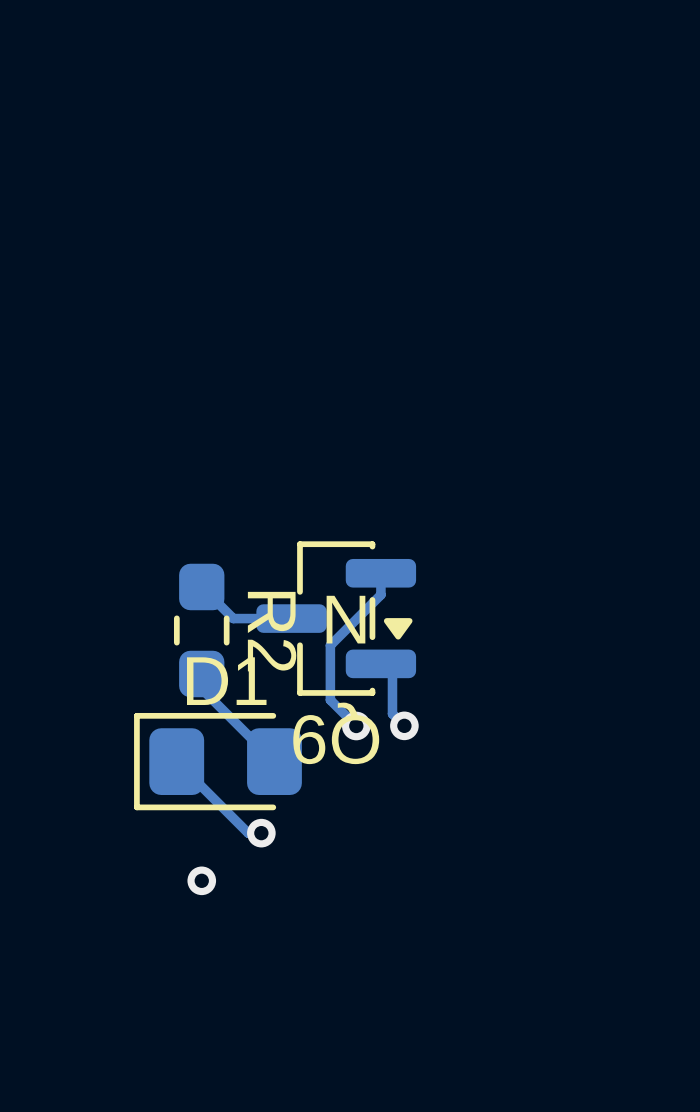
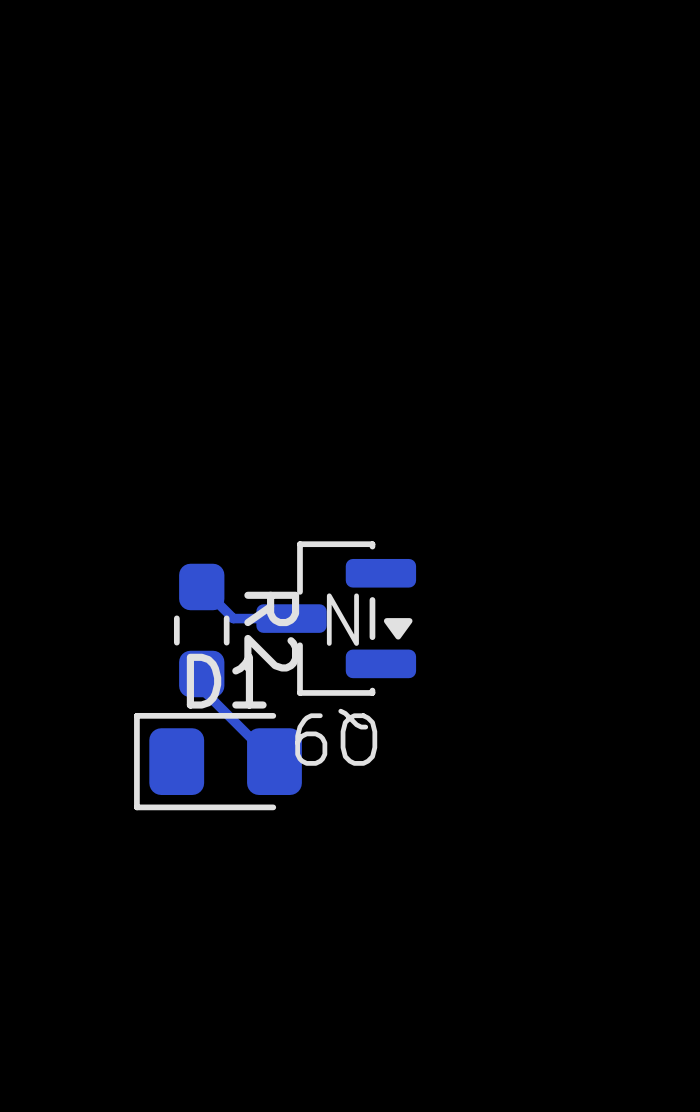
track: (380, 573) (380, 594) (330, 645) (330, 700) (356, 725) -> none
track: (380, 663) (392, 675) (392, 713) (404, 725) -> none
via: (356, 725) -> none
via: (404, 725) -> none
track: (176, 761) (248, 833) (261, 833) -> none
via: (261, 833) -> none
via: (201, 880) -> none

